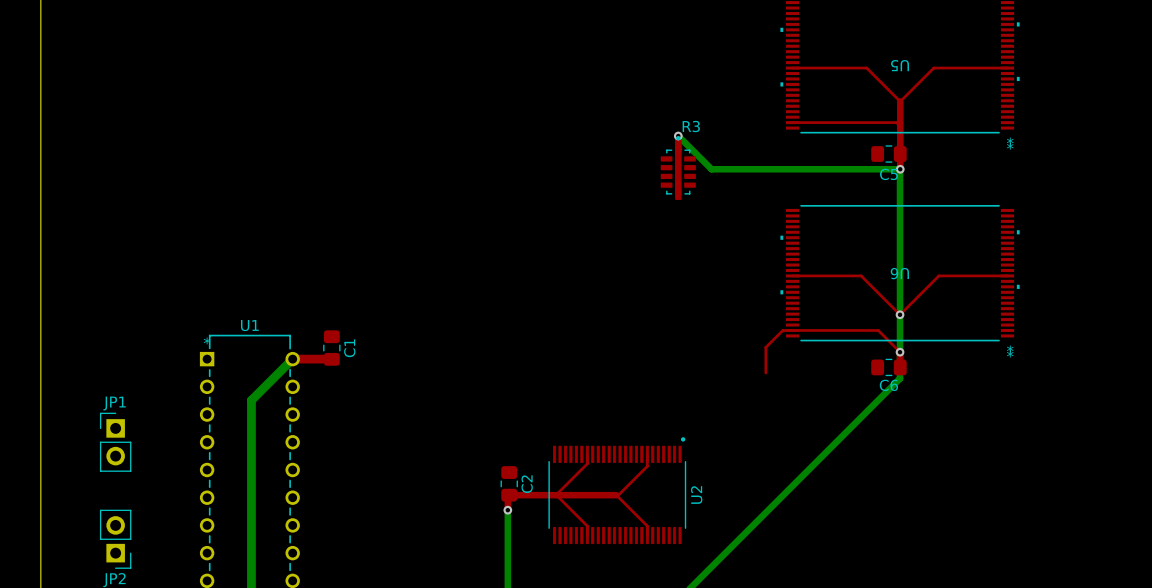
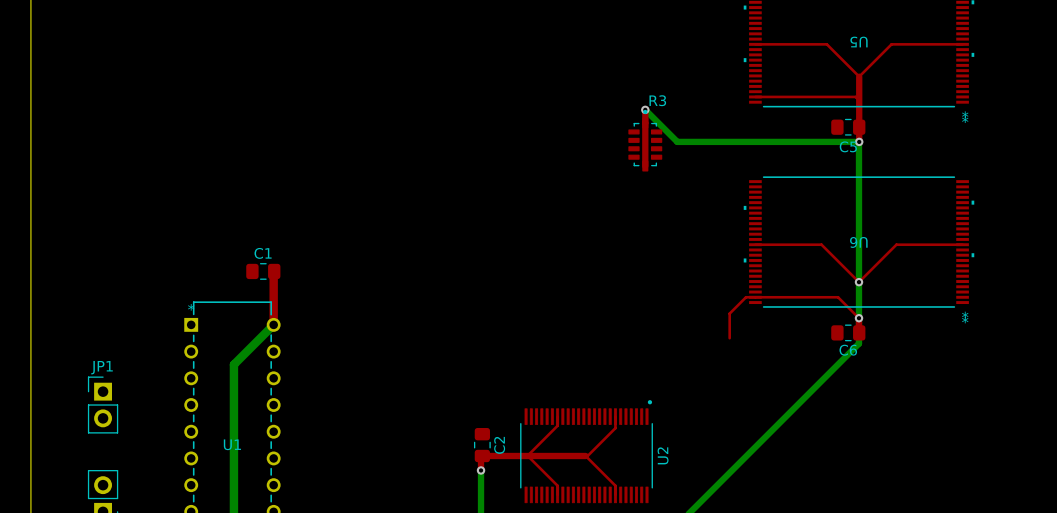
U1 name position: U1 (249, 325) -> U1 (232, 444)
C1 rotation: 0° (331, 348) -> 90° clockwise (263, 271)
C1 position: (331, 348) -> (263, 271)
C1 name position: C1 (349, 348) -> C1 (263, 253)
top track: (292, 359) (331, 359) -> (273, 324) (274, 271)

